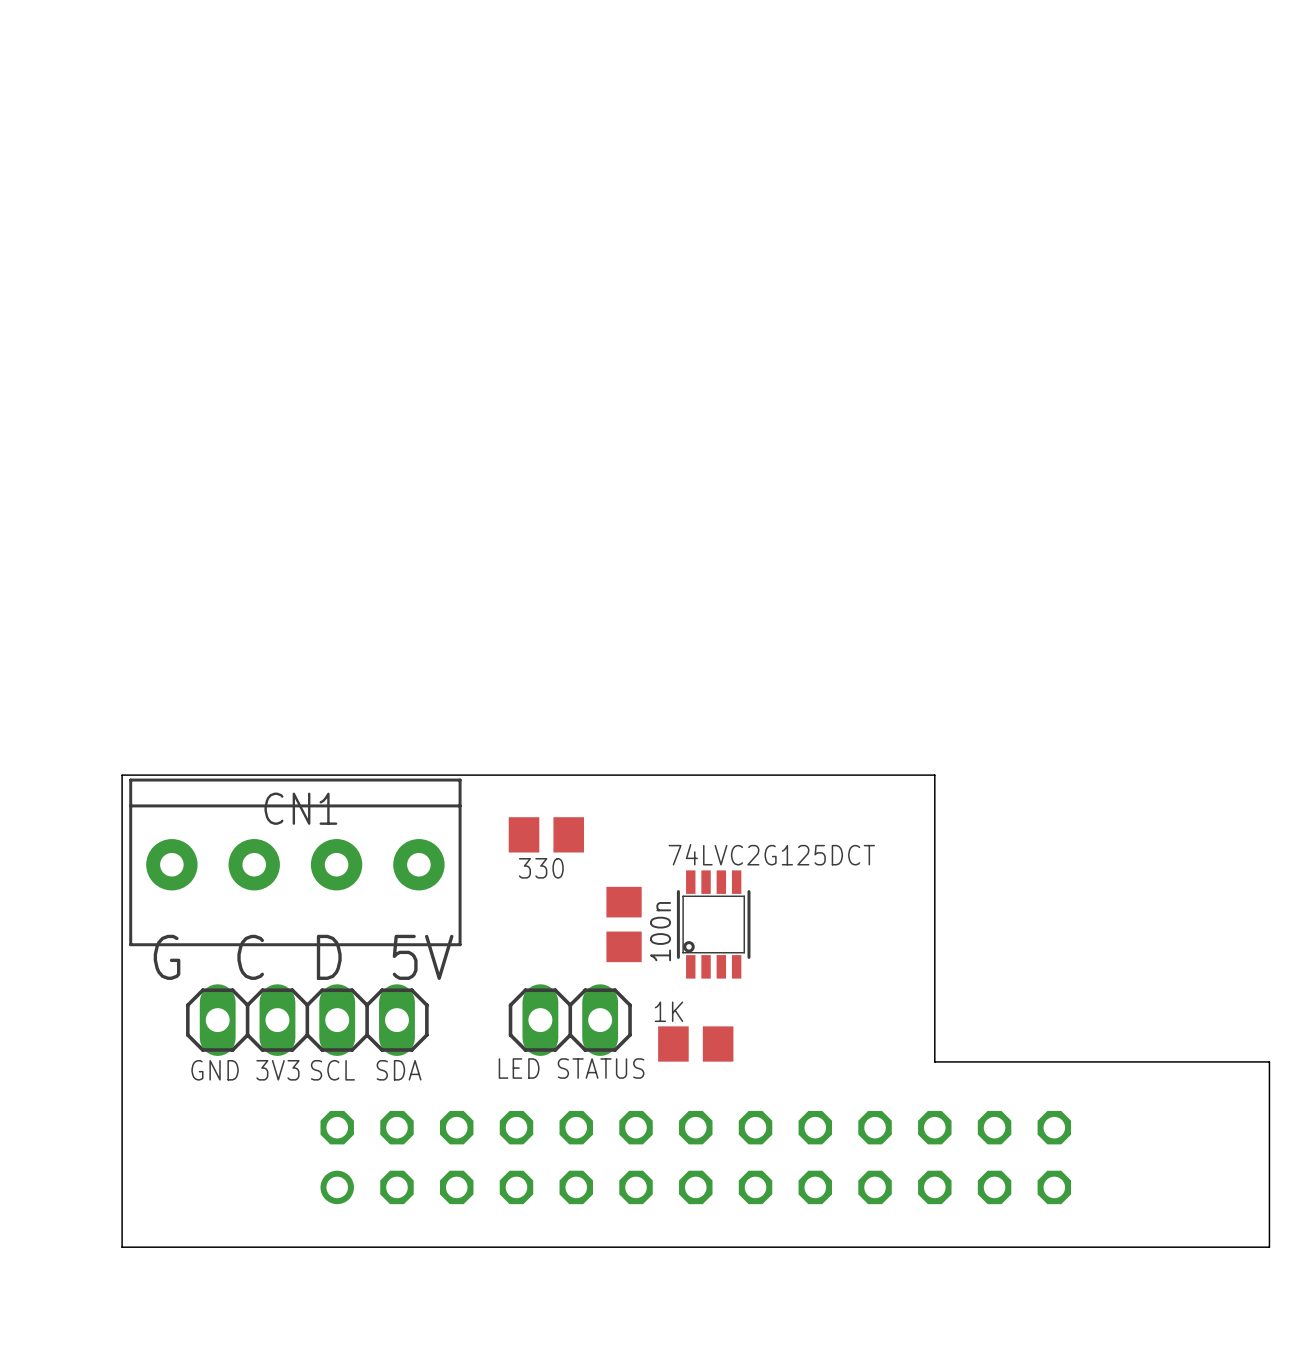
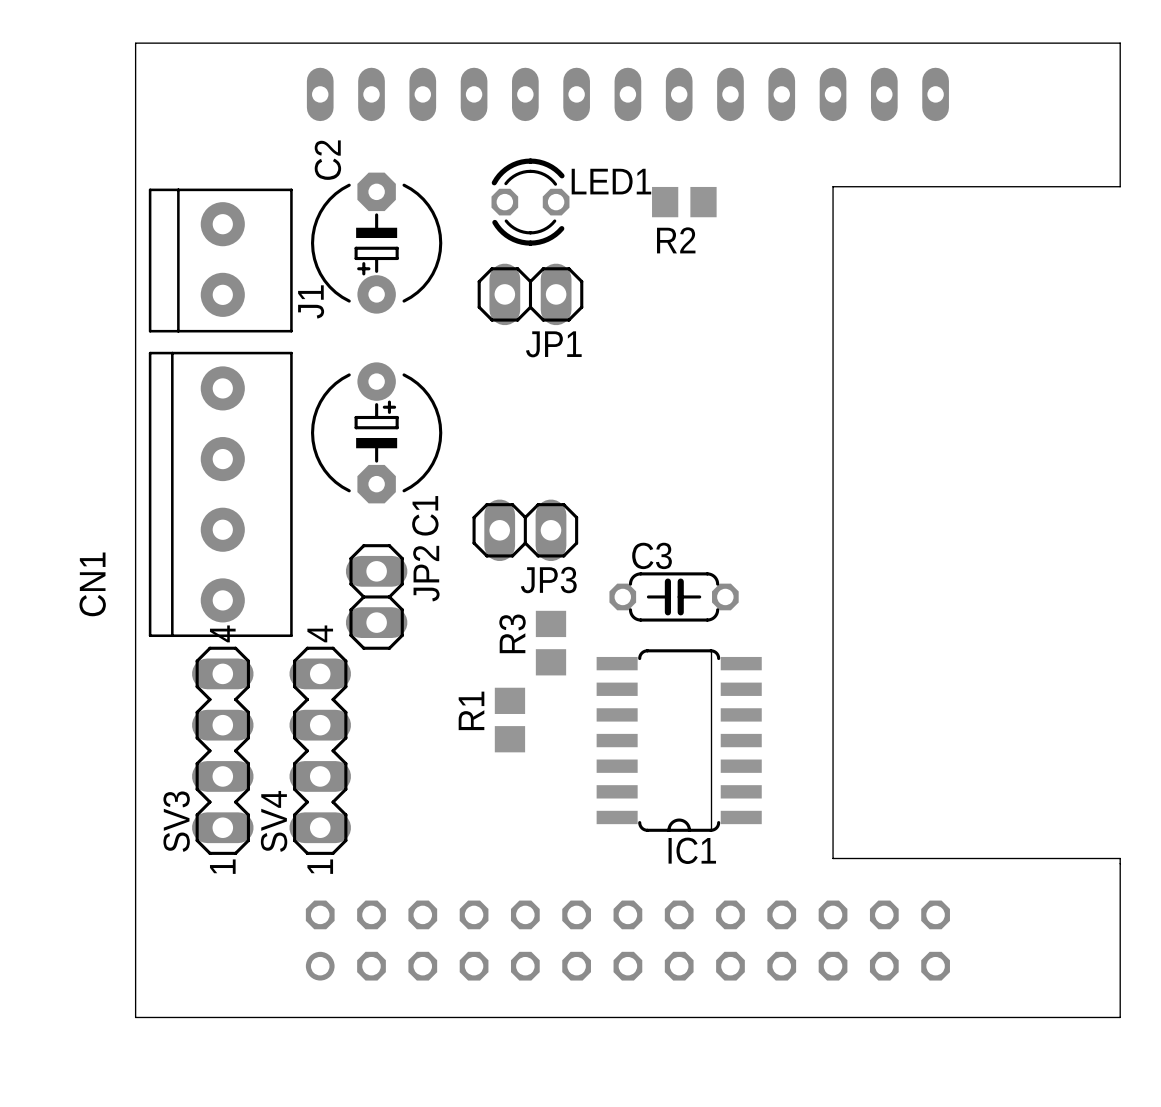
board edge: none -> (135, 43) (135, 612)
part: none -> (627, 94)
LED1: none -> (530, 202)
R2: none -> (684, 202)
C2: none -> (376, 243)
J1: none -> (220, 260)
JP1: none -> (530, 294)
C1: none -> (376, 432)
JP3: none -> (525, 530)
JP2: none -> (376, 596)
C3: none -> (674, 596)
board edge: (122, 775) (934, 775) -> (135, 43) (1120, 43) (1120, 186) (833, 186) (833, 612)
CN1 name position: CN1 (300, 808) -> CN1 (92, 584)
R3: none -> (550, 643)
part: 330 (546, 834) -> none
CN1 rotation: 0° (295, 862) -> 90° counterclockwise (220, 494)
CN1 position: (295, 862) -> (220, 494)
R1: none -> (509, 720)
part: 100n (624, 924) -> none
part: 74LVC2G125DCT (713, 924) -> none
IC1: none -> (679, 740)
SV3: none -> (222, 750)
SV4: none -> (320, 750)
text: G (167, 957) -> none
text: C (250, 957) -> none
text: D (329, 957) -> none
text: 5V (423, 957) -> none
part: (307, 1020) -> none
part: LED STATUS (570, 1020) -> none
part: 1K (695, 1044) -> none
text: GND (215, 1070) -> none
text: 3V3 (277, 1070) -> none
text: SCL (332, 1070) -> none
text: SDA (399, 1070) -> none

